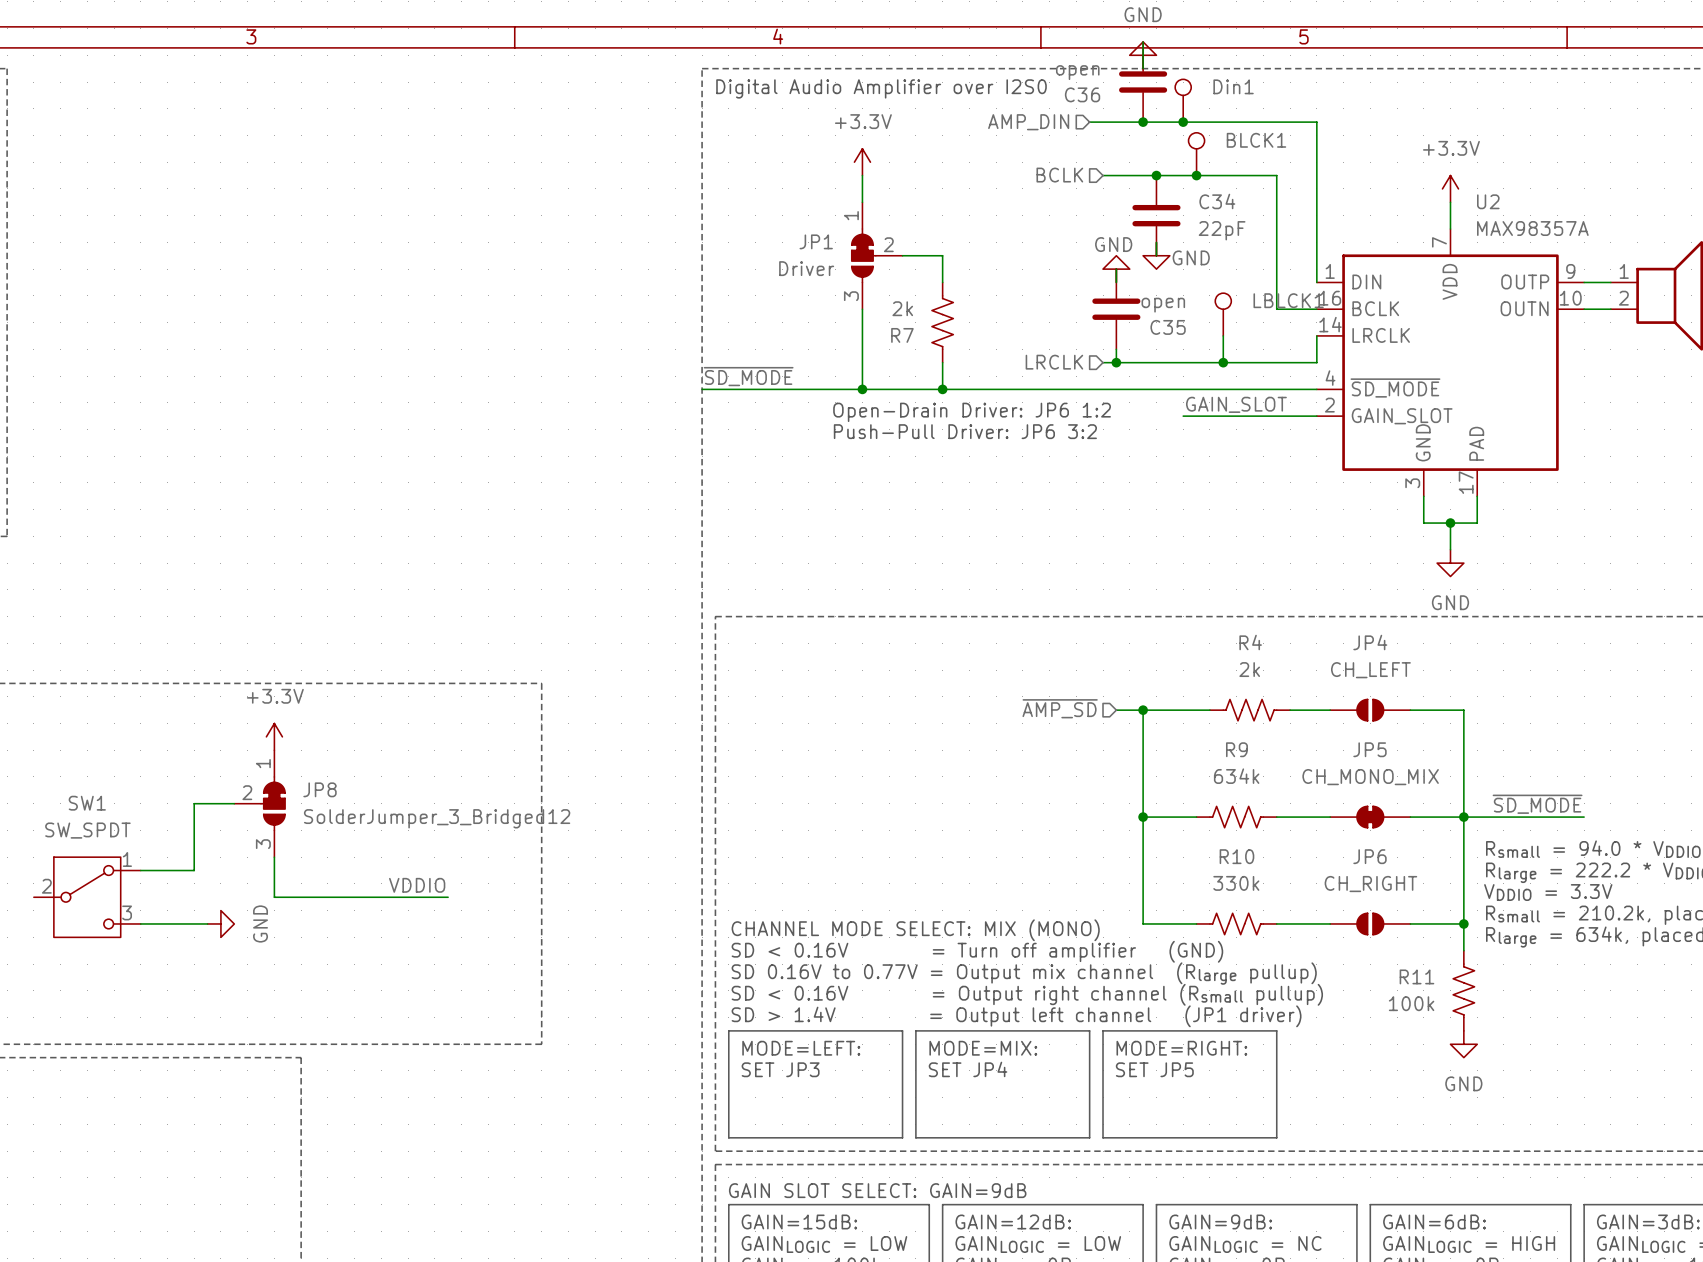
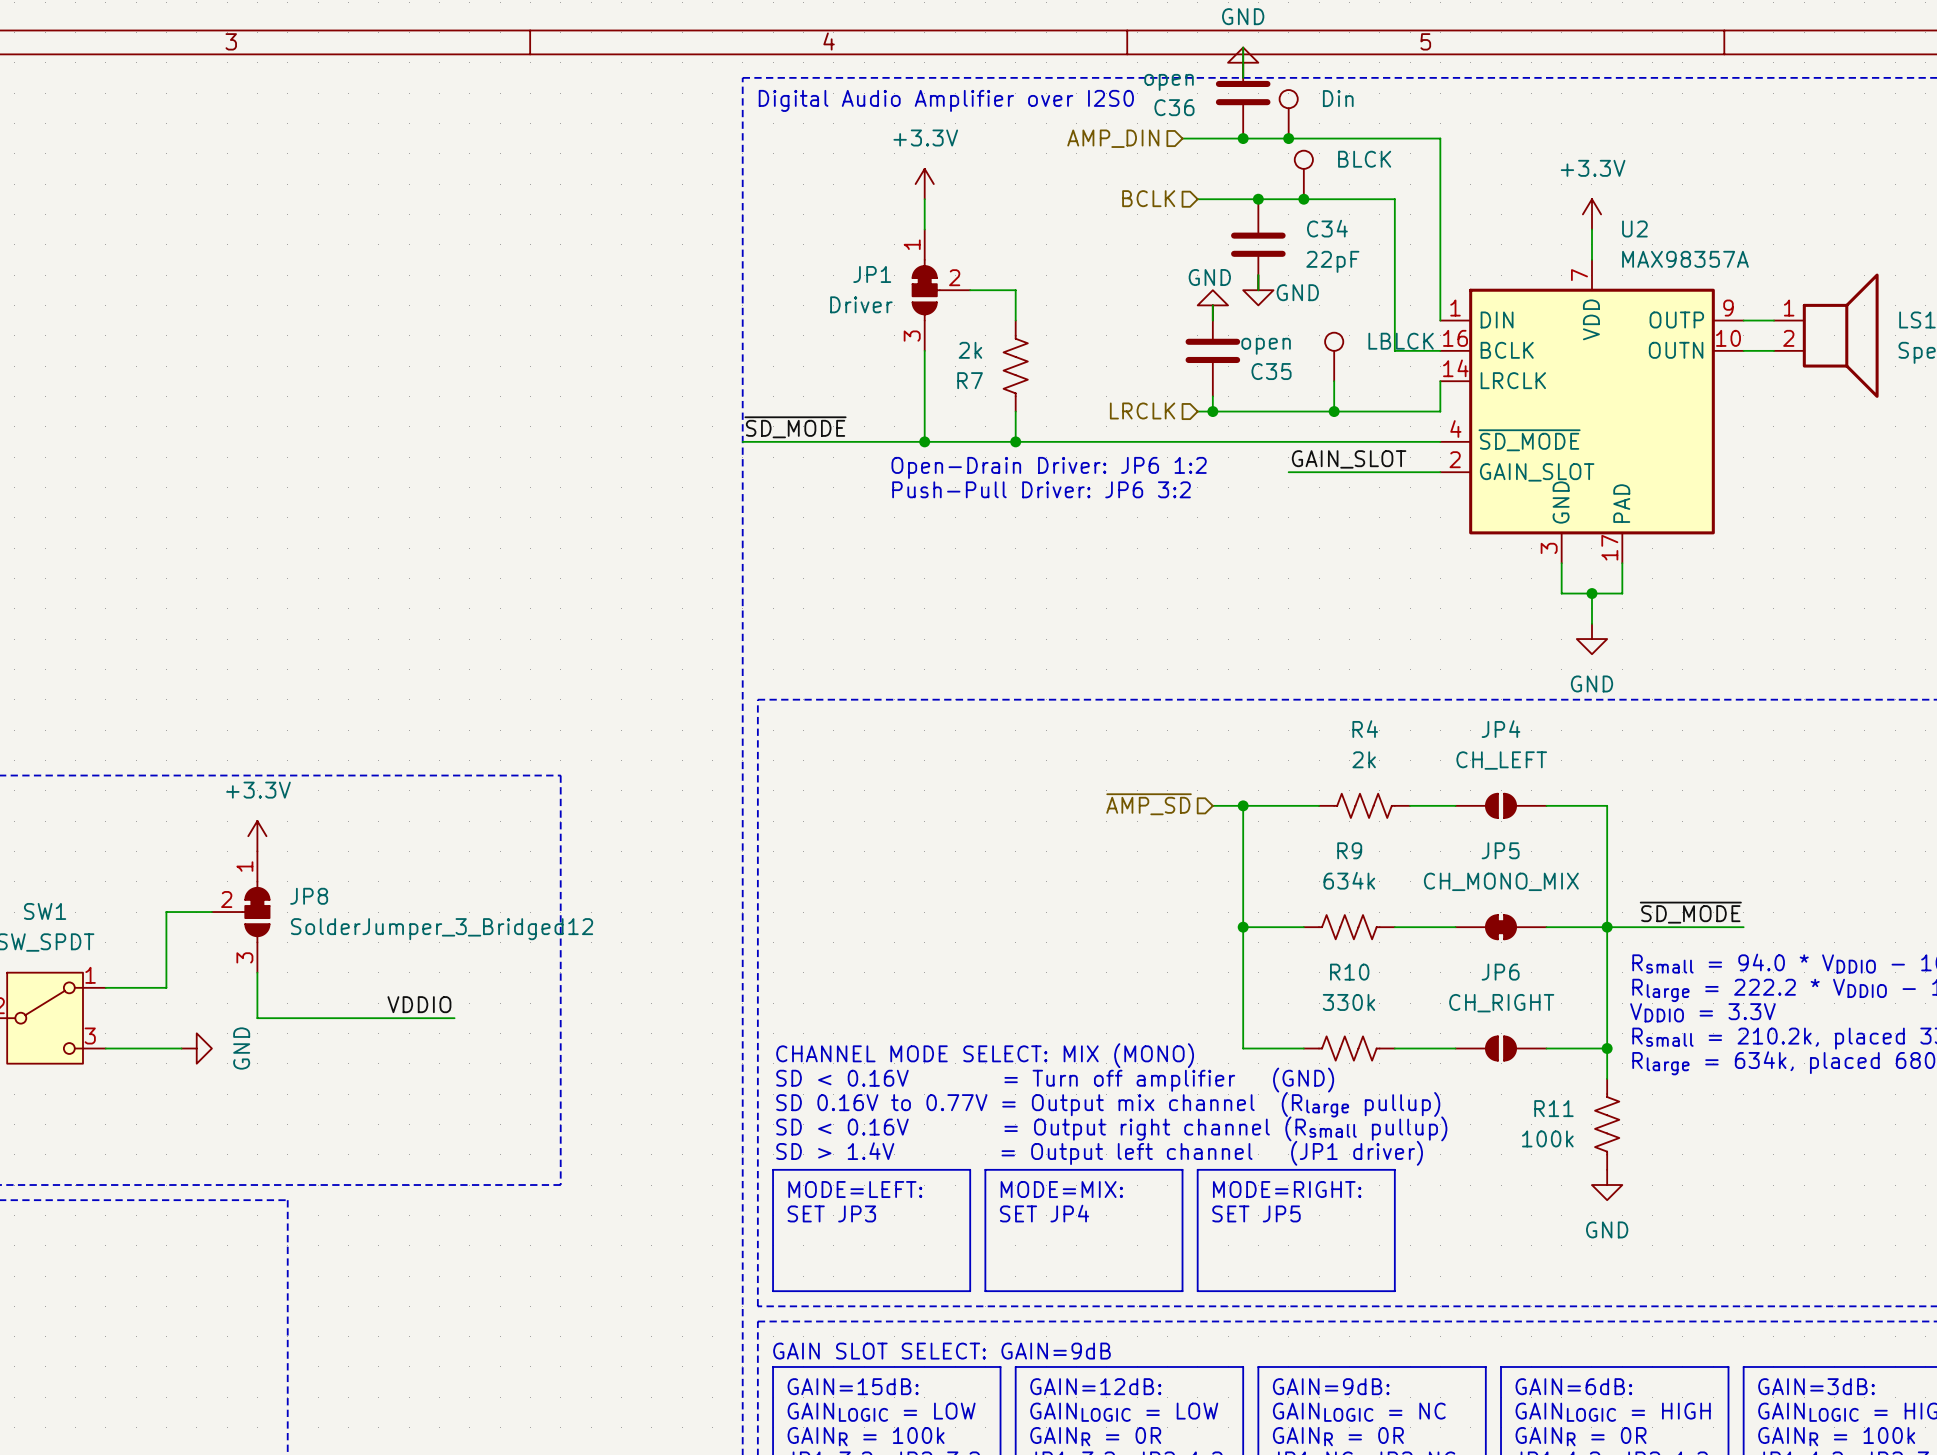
Din1 name: Din1 (1233, 86) -> Din (1338, 98)
BLCK1 name: BLCK1 (1256, 140) -> BLCK (1364, 159)
LBLCK1 name: LBLCK1 (1288, 300) -> LBLCK (1401, 341)

